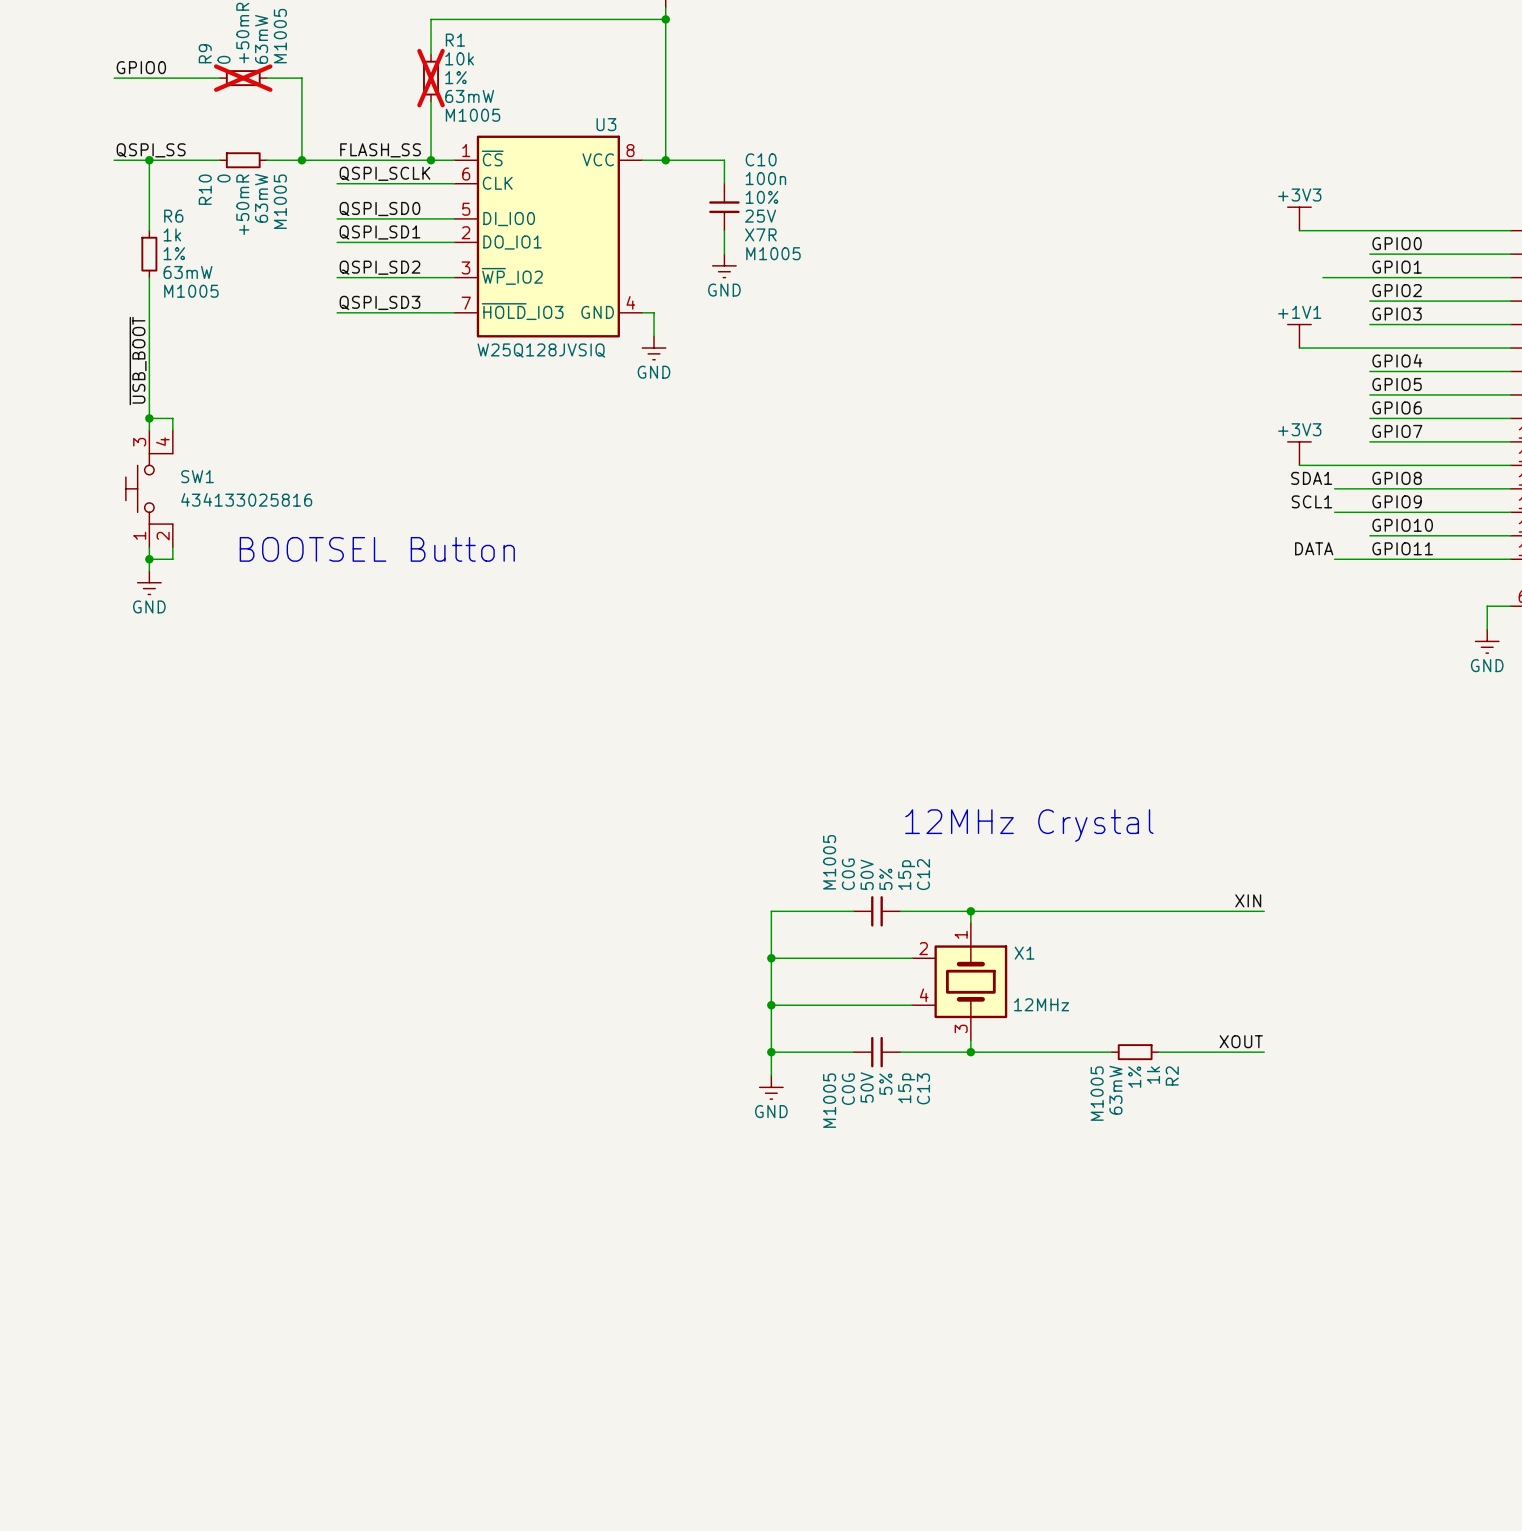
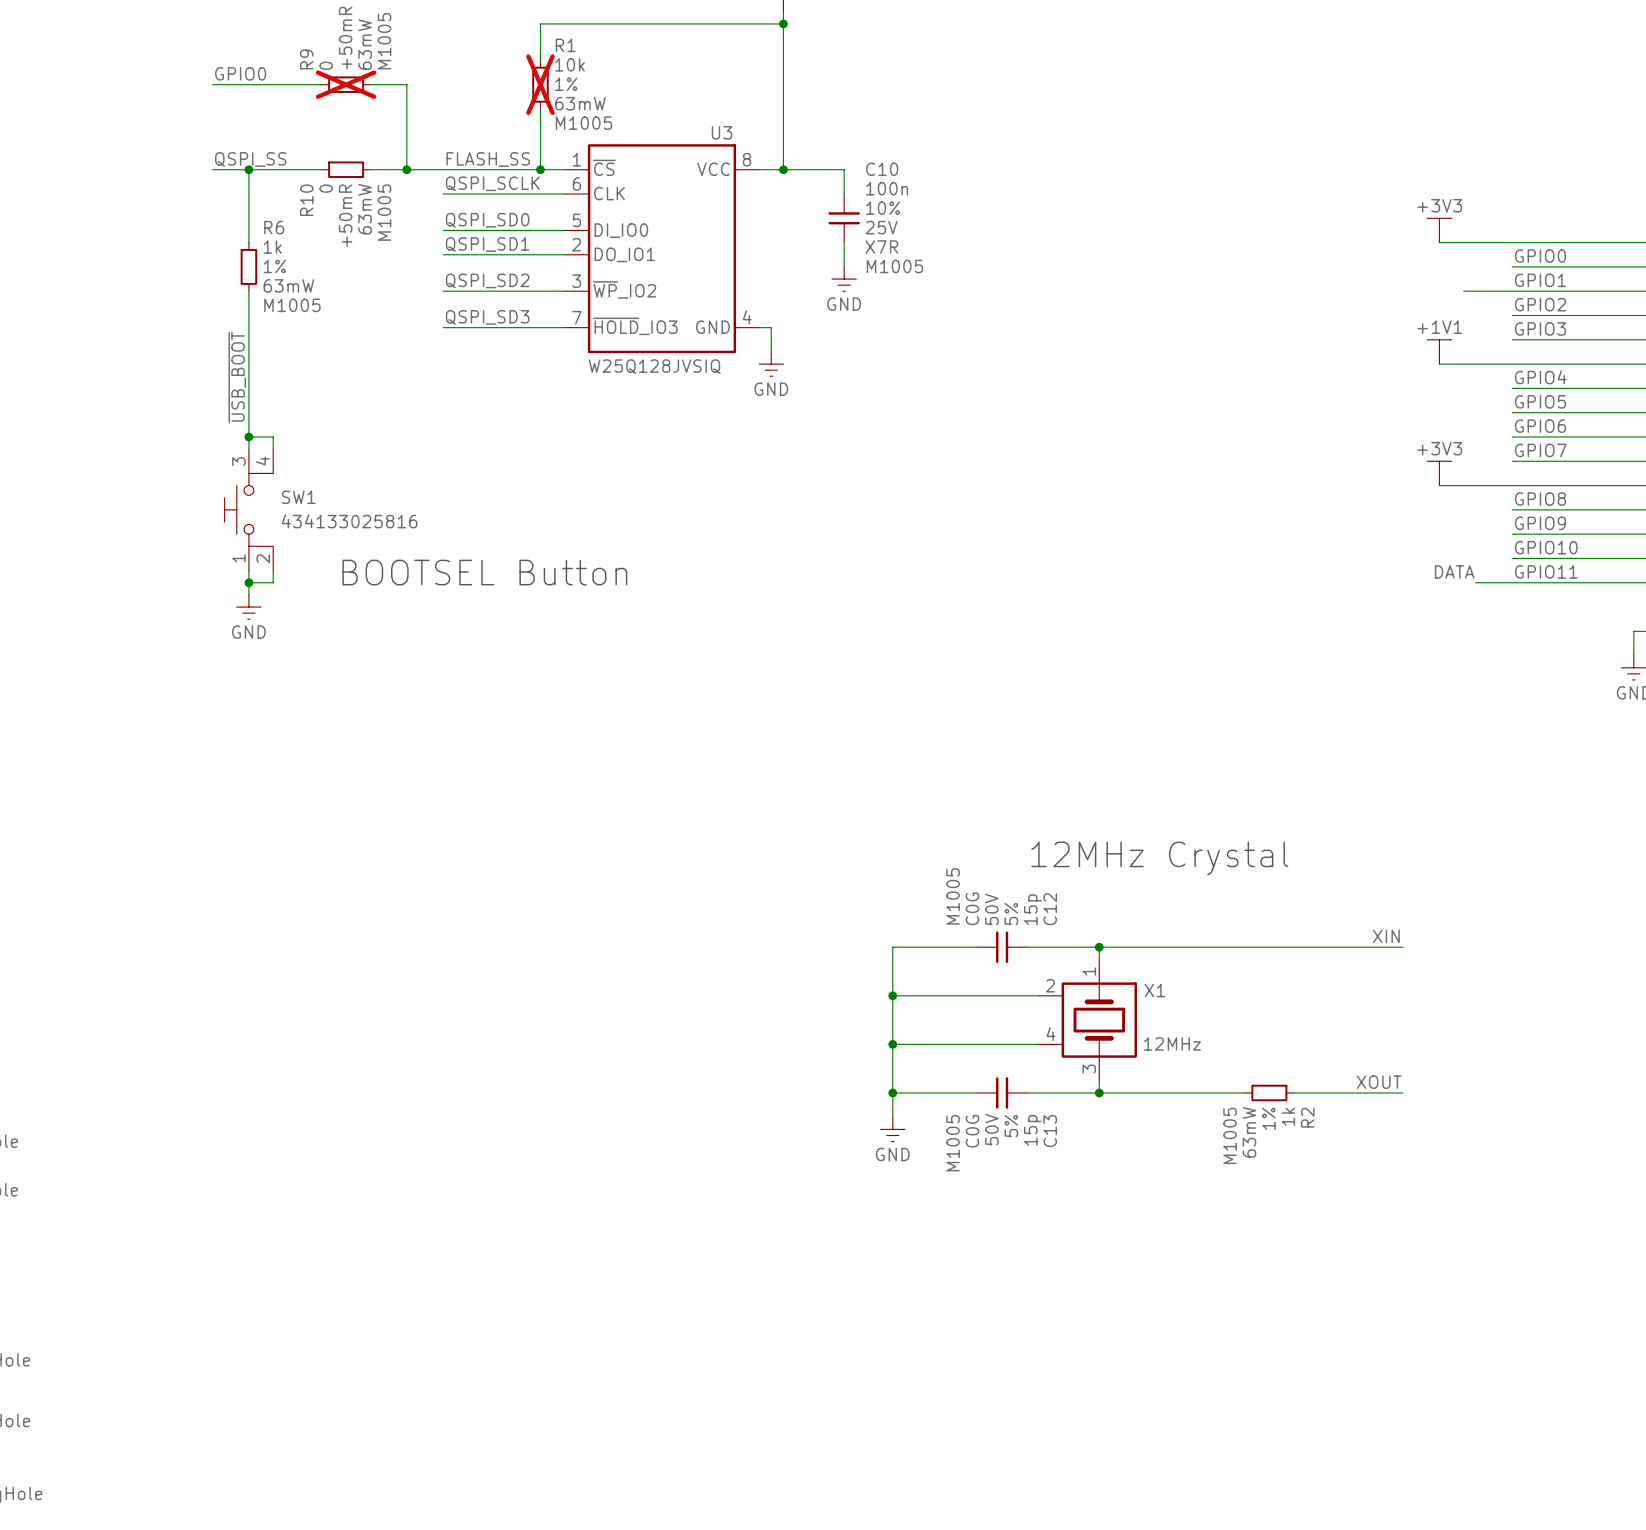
label: SDA1 (1311, 478) -> none
wire: (1334, 488) (1369, 488) -> none
label: SCL1 (1311, 501) -> none
wire: (1334, 512) (1369, 512) -> none

